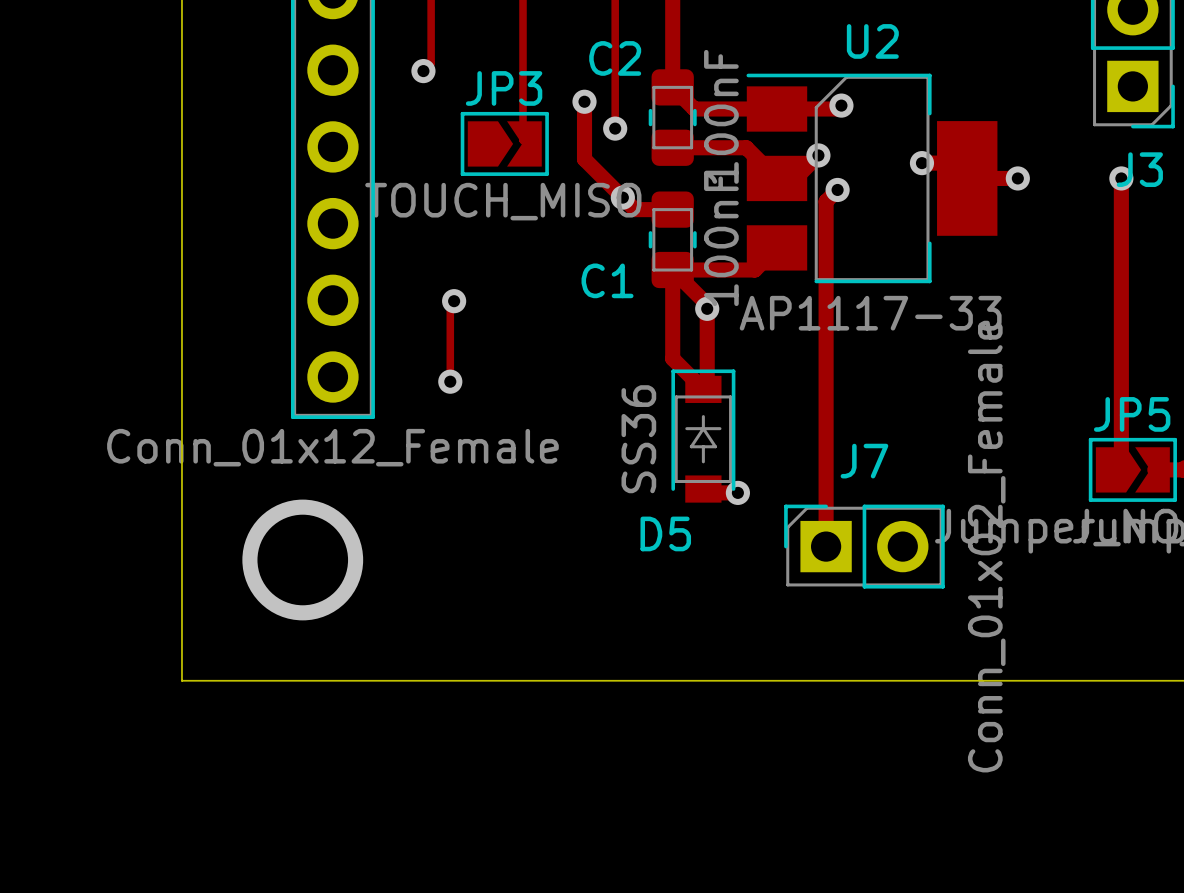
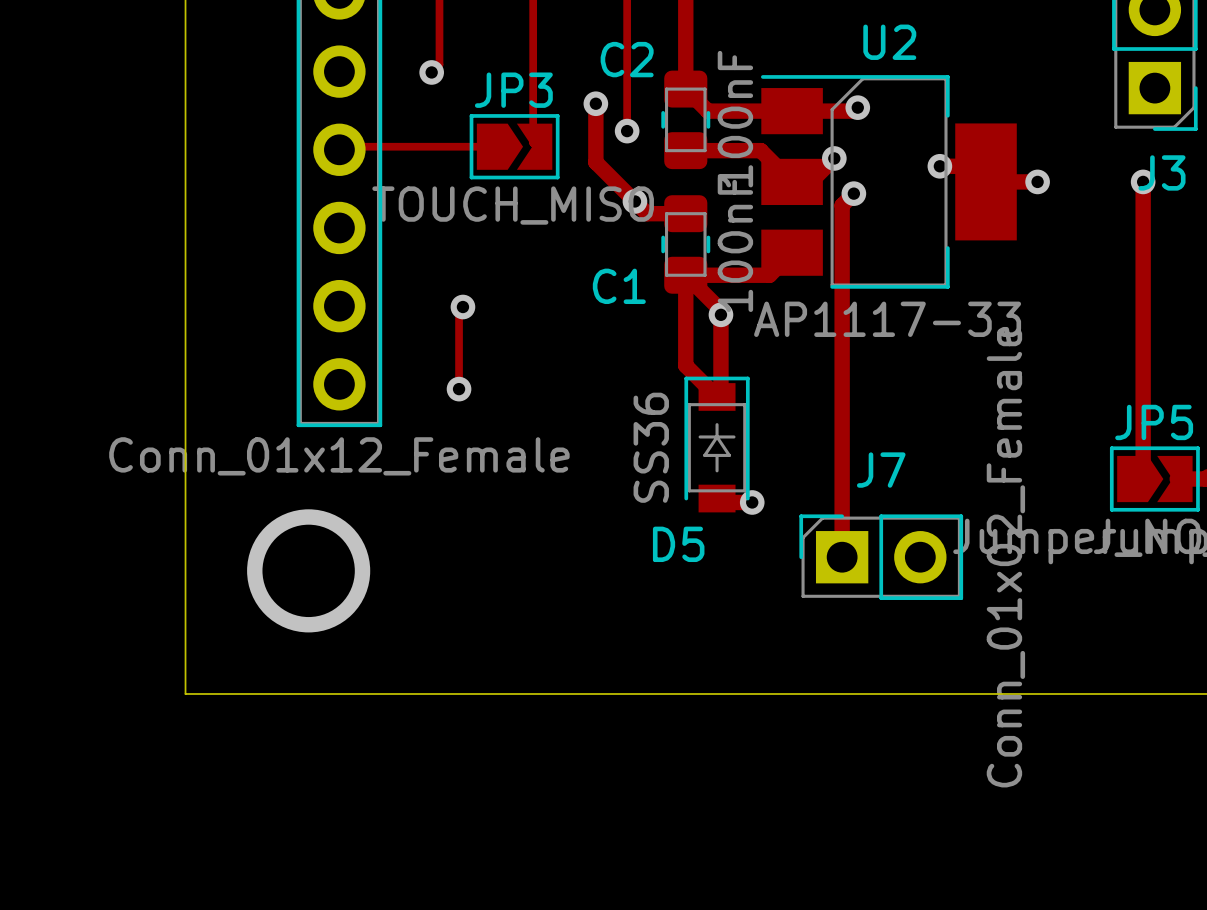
track: none -> (492, 146) (342, 146) (339, 149)

